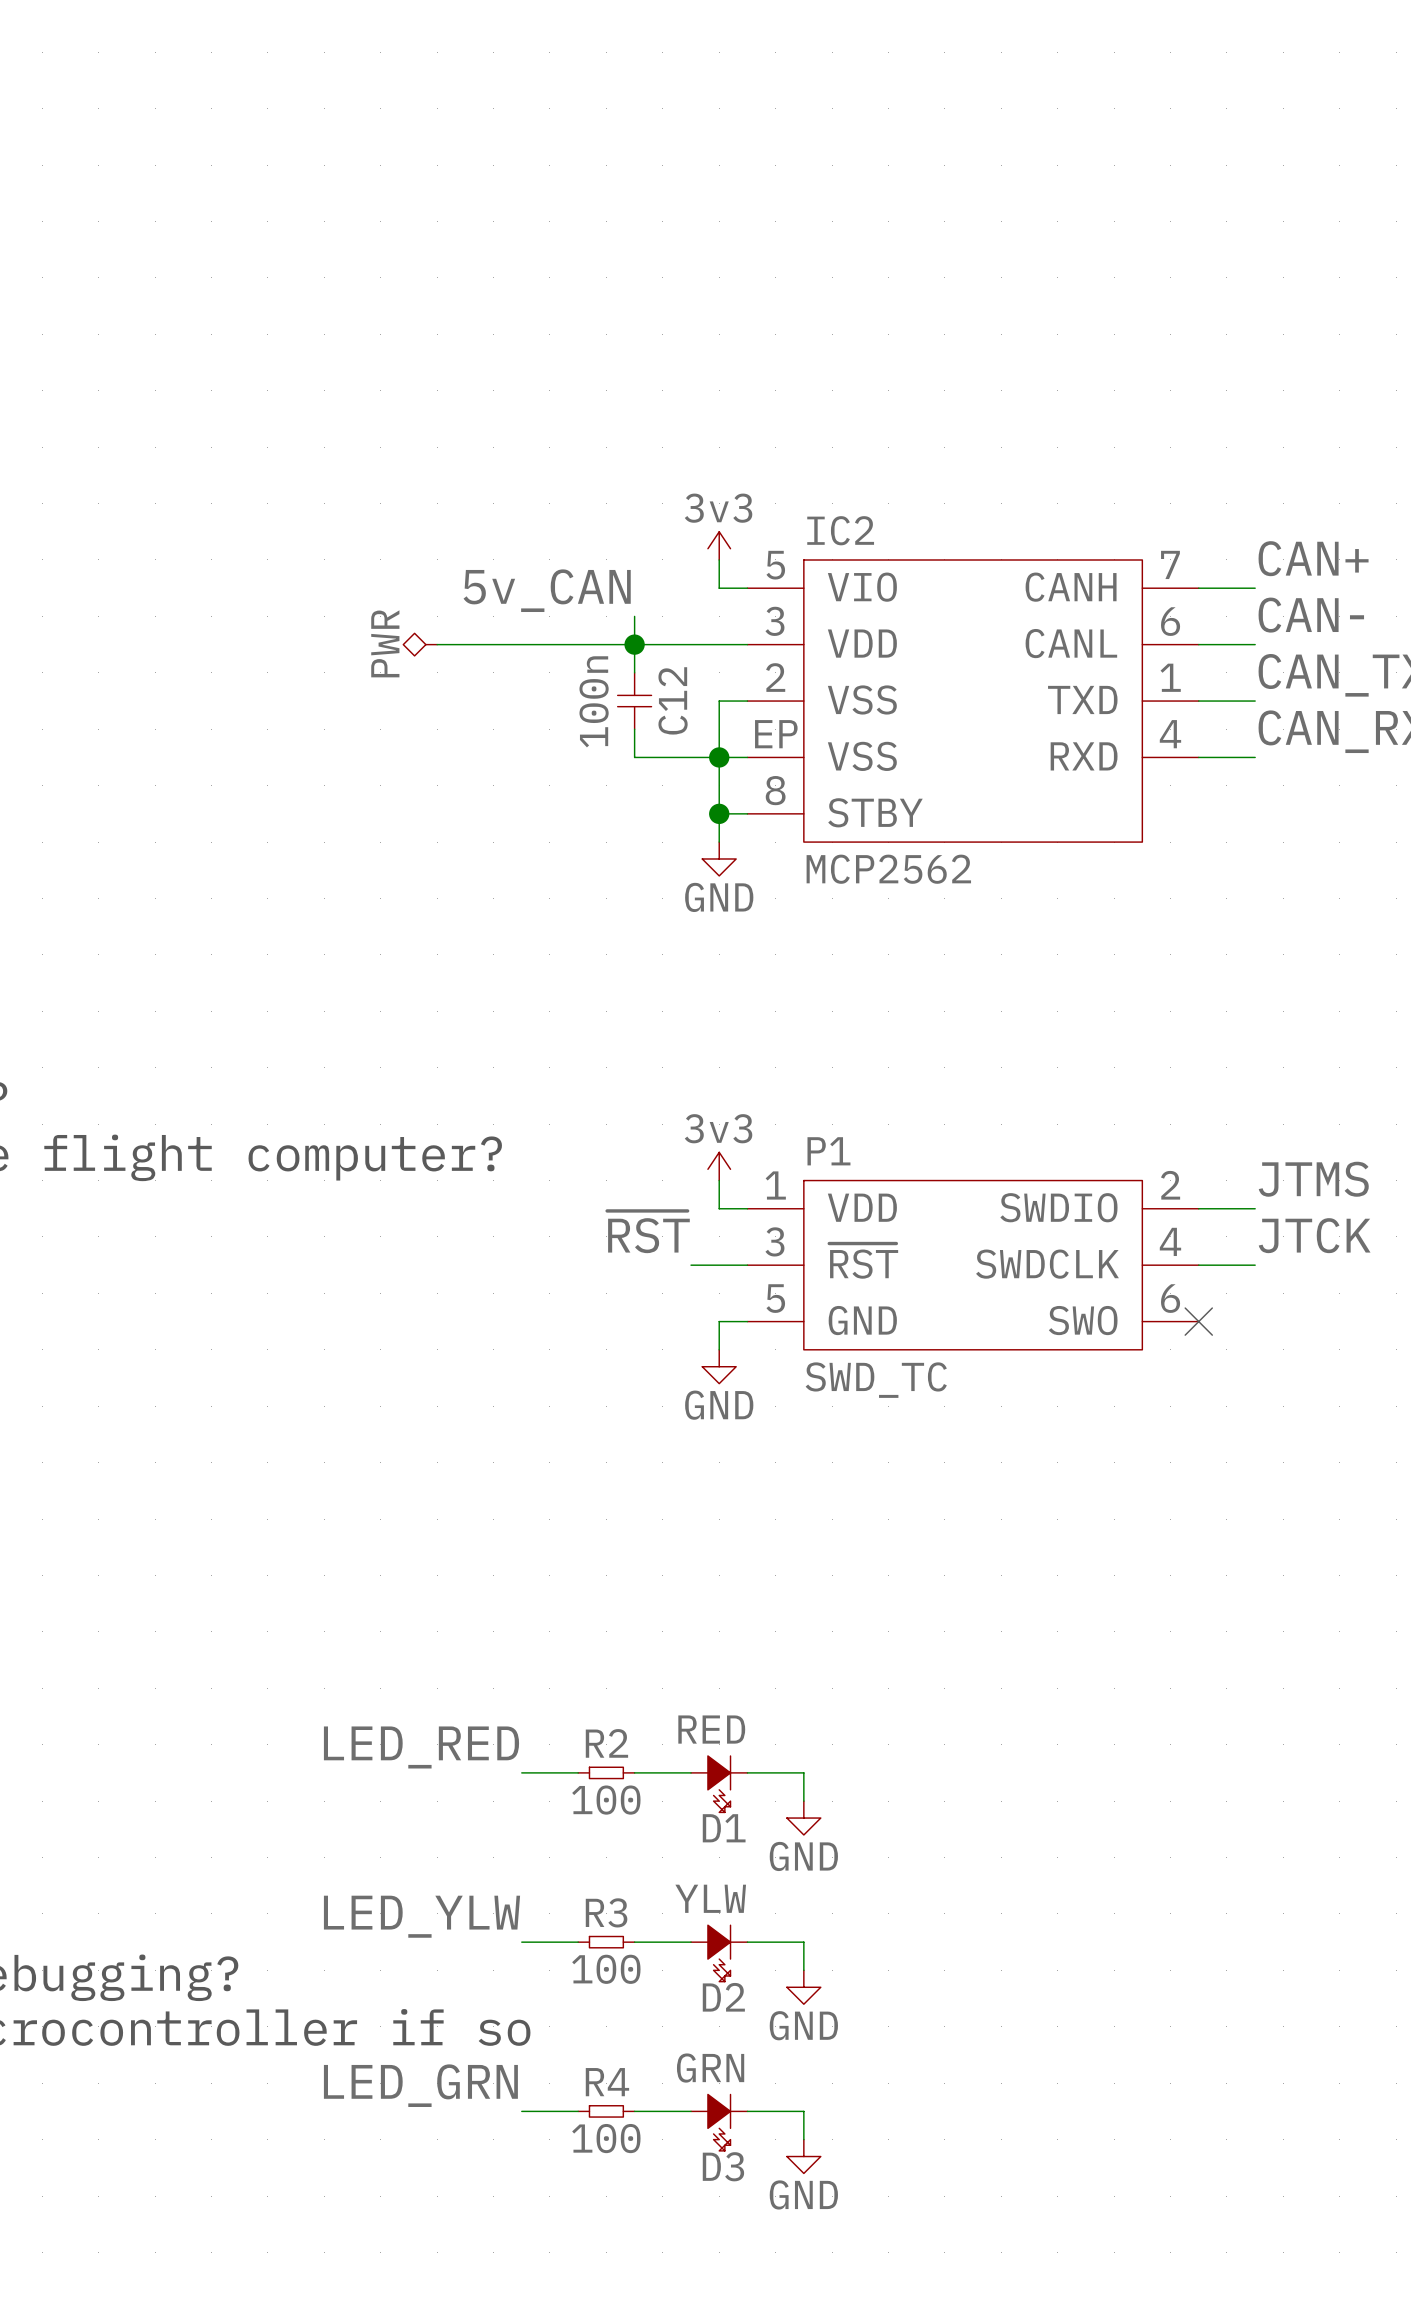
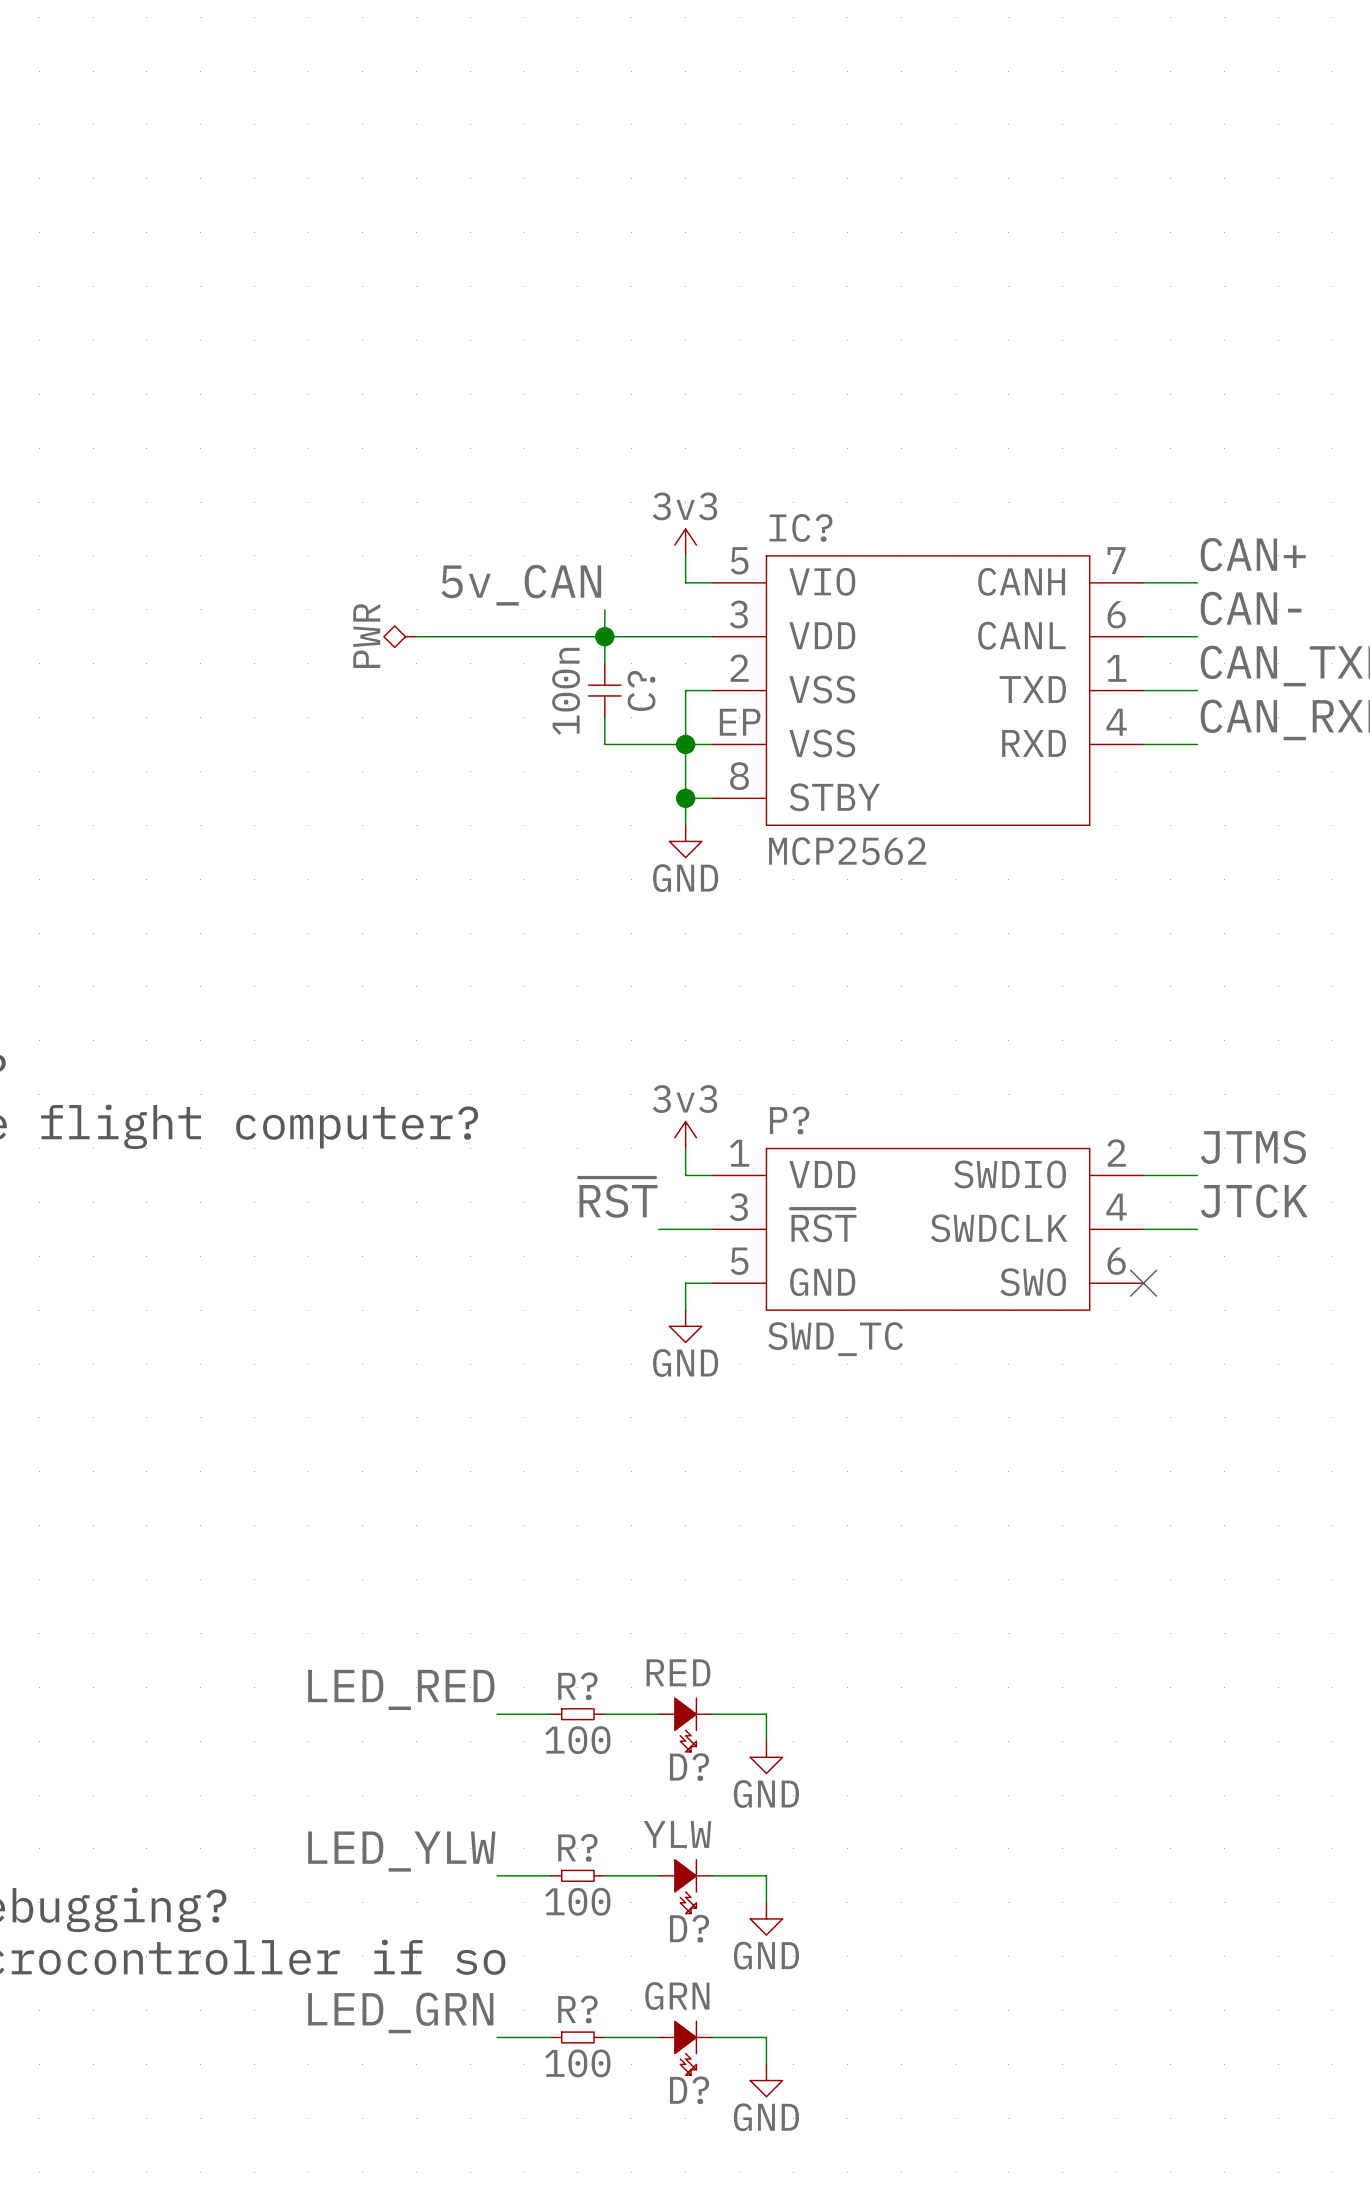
IC2 name: IC2 (840, 530) -> IC? (801, 527)
C12 name: C12 (673, 700) -> C? (641, 690)
P1 name: P1 (828, 1151) -> P? (789, 1120)
R2 name: R2 (606, 1743) -> R? (577, 1686)
D1 name: D1 (724, 1828) -> D? (689, 1767)
R3 name: R3 (606, 1912) -> R? (577, 1847)
D2 name: D2 (723, 1997) -> D? (689, 1928)
R4 name: R4 (607, 2082) -> R? (577, 2009)
D3 name: D3 (723, 2166) -> D? (689, 2090)

